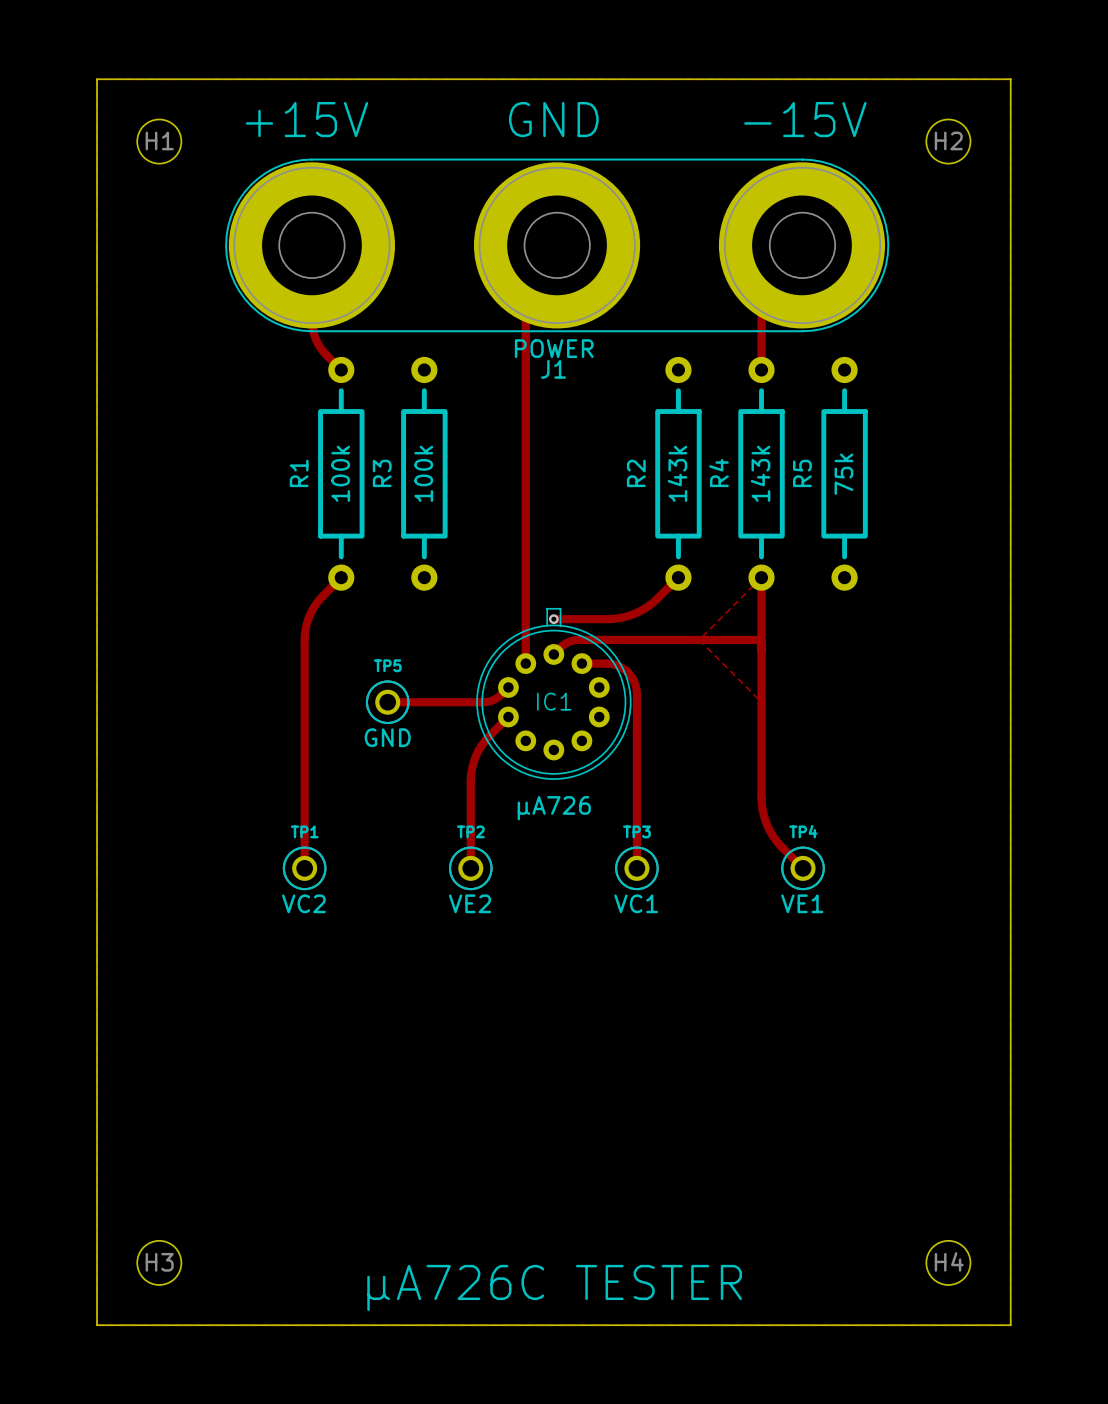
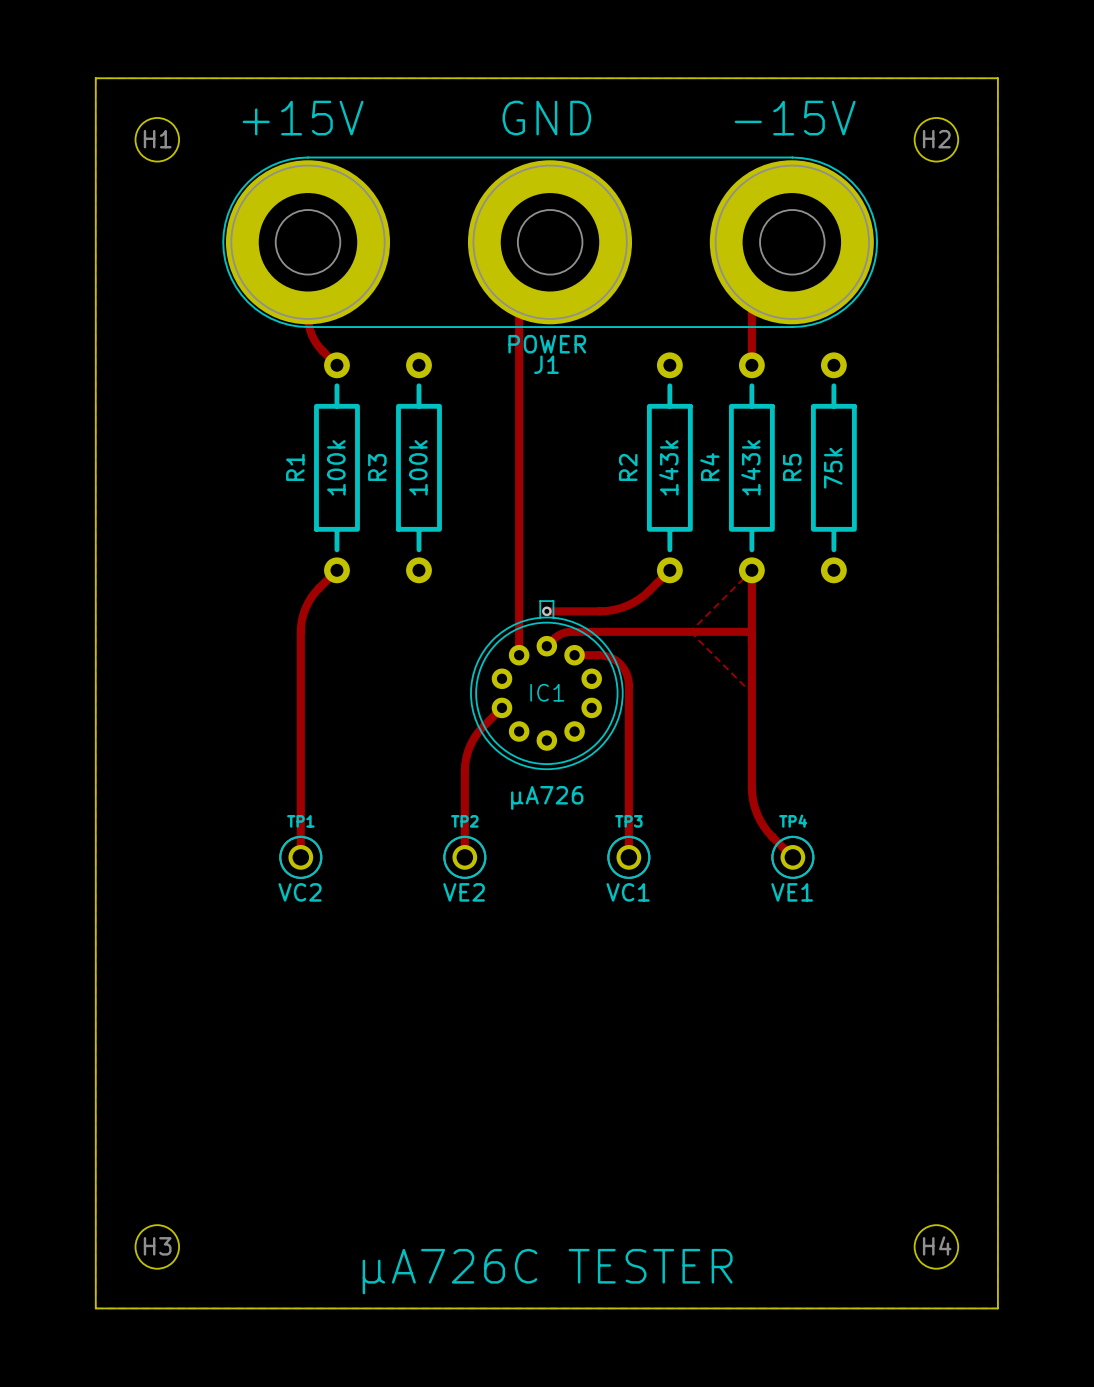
track: (508, 687) (495, 698) (486, 702) (387, 702) -> none
TP5: GND (387, 702) -> none

